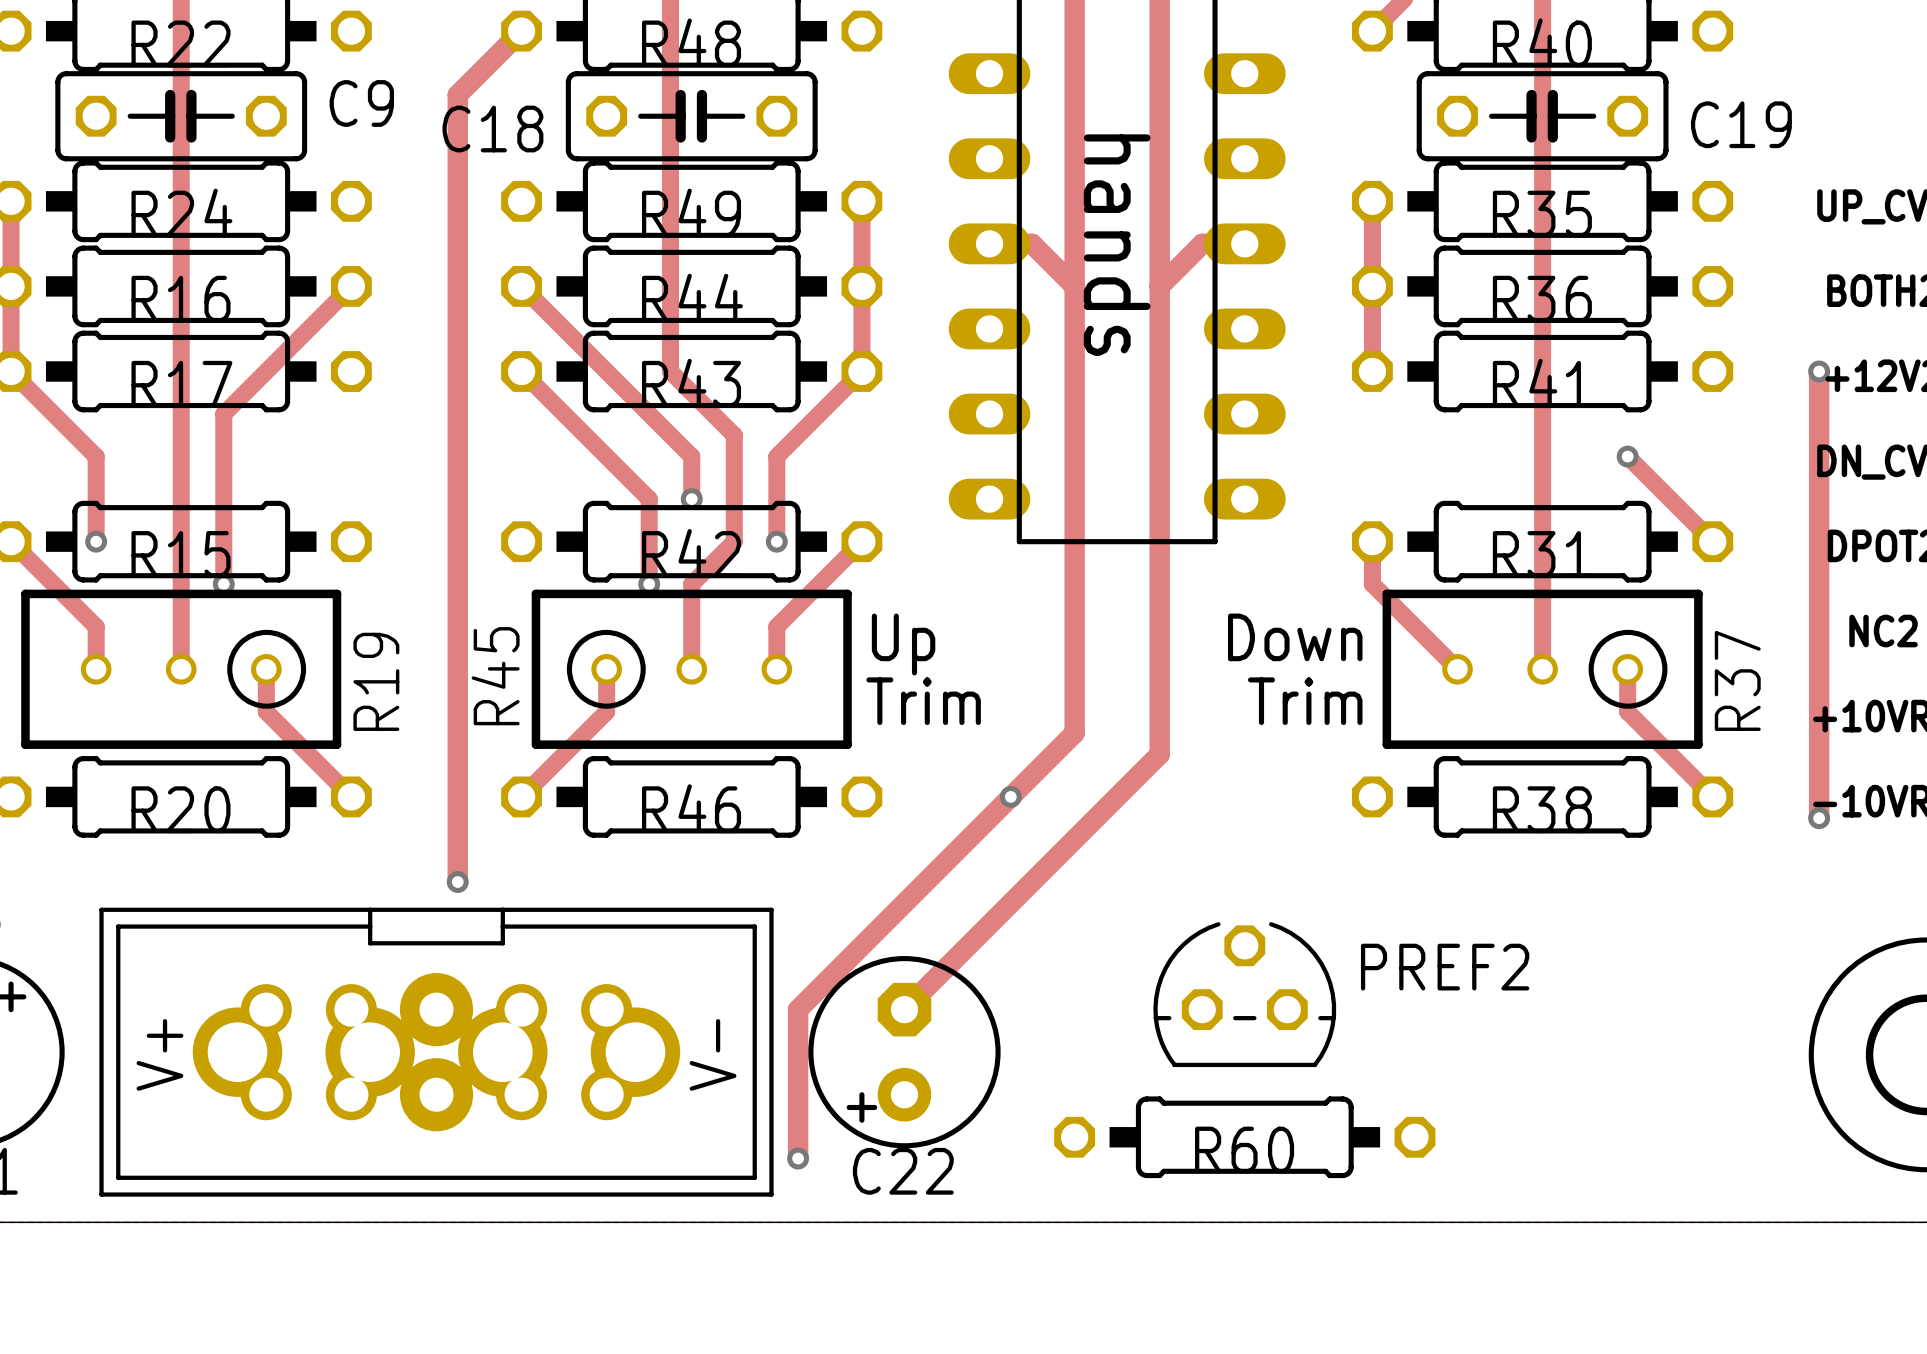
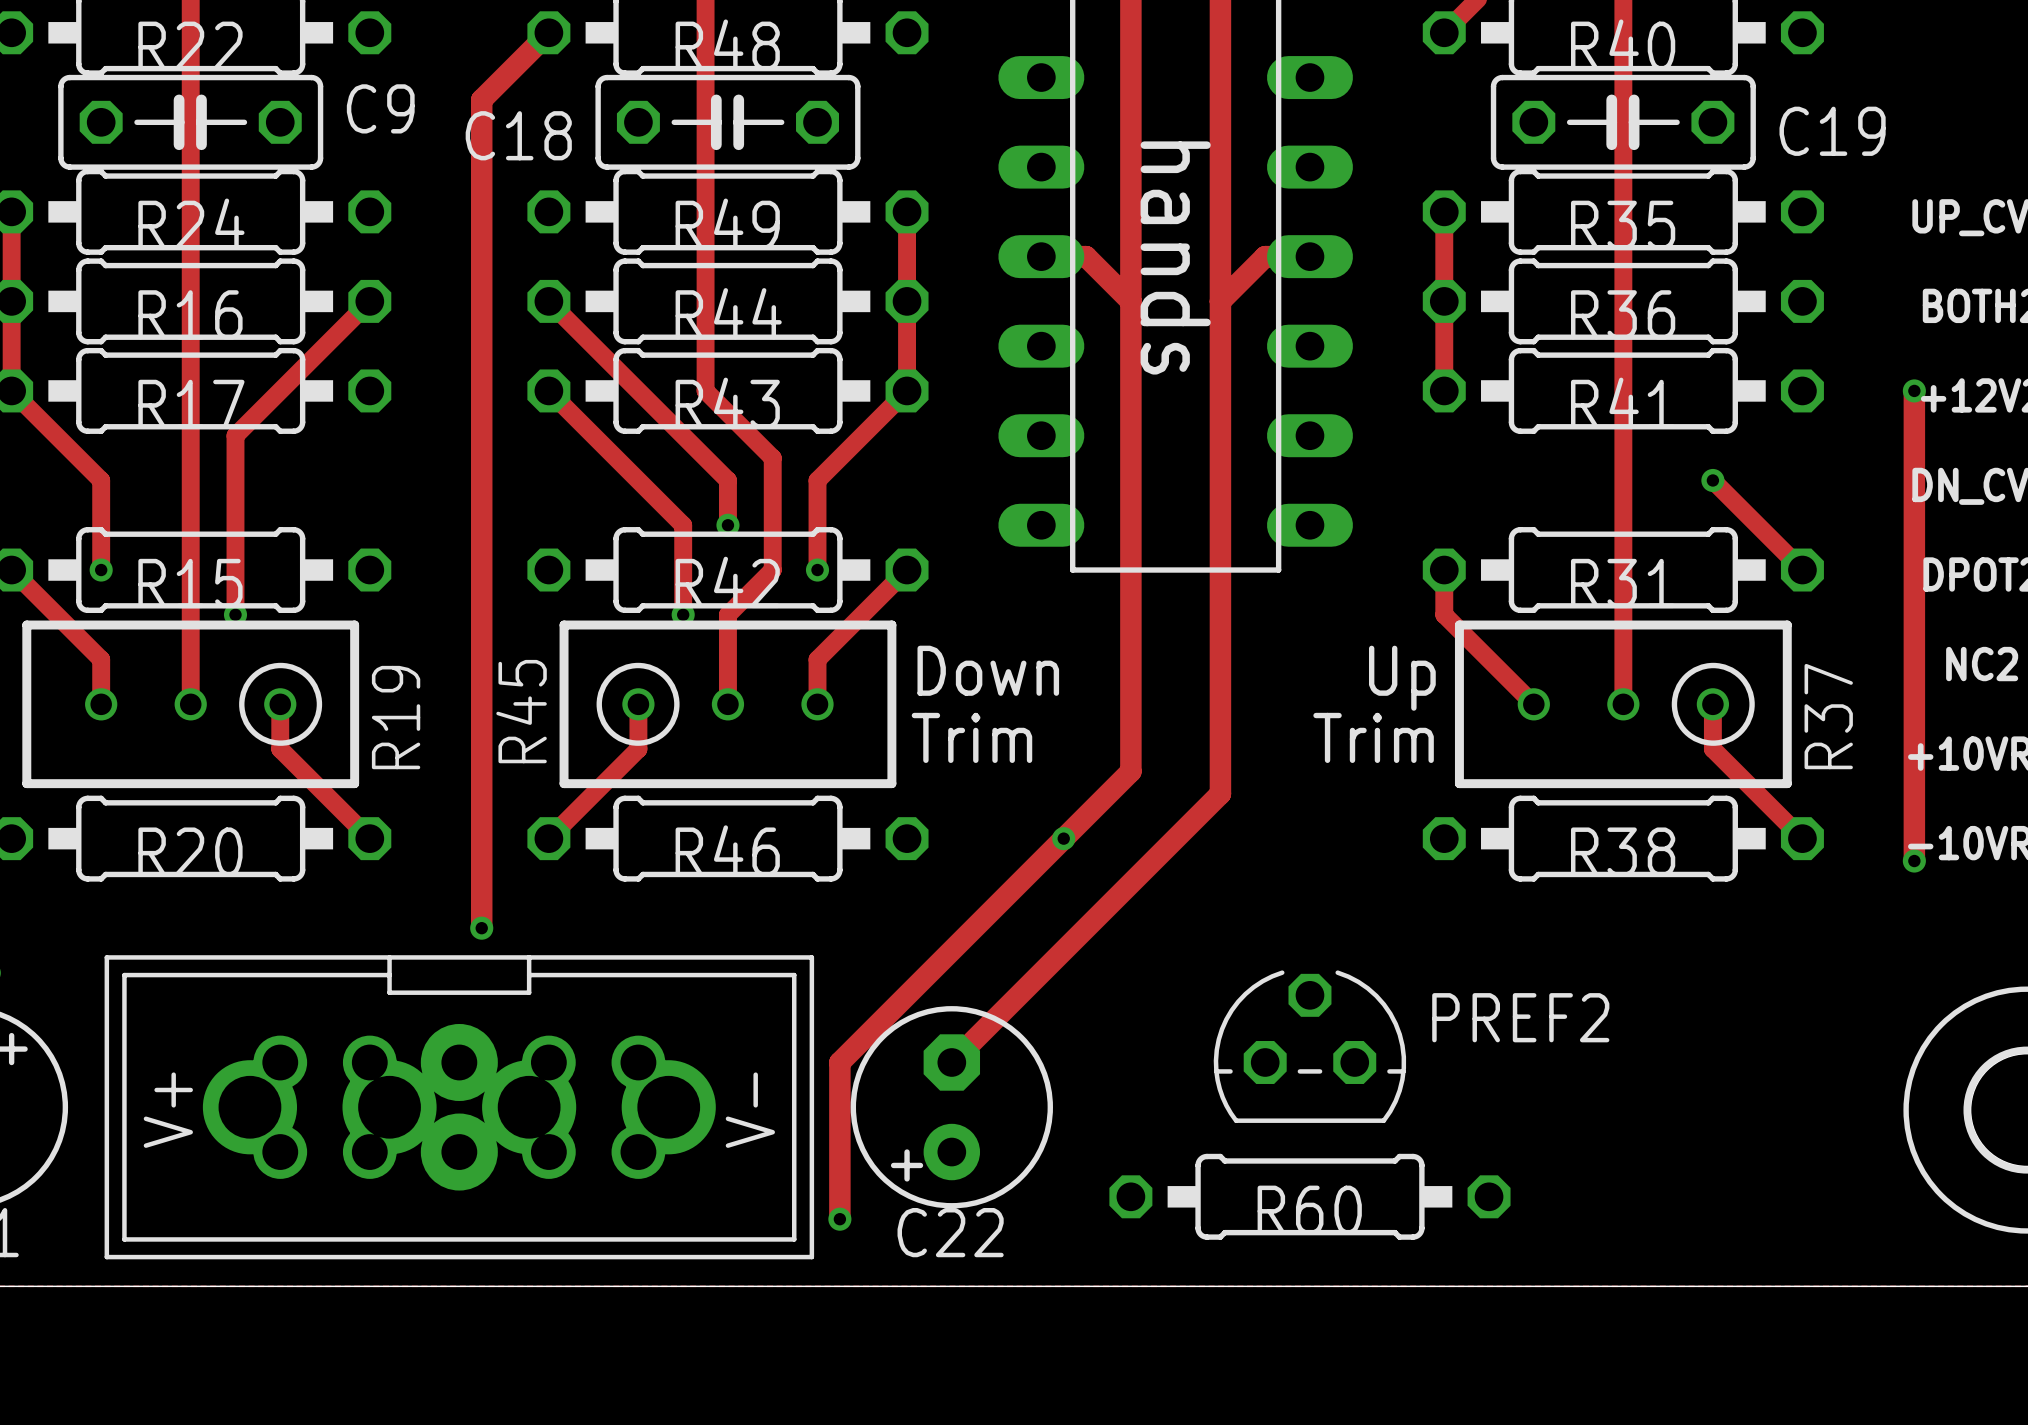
text: Down (1295, 637) -> Up (1402, 678)
text: Up (903, 644) -> Down (988, 670)

